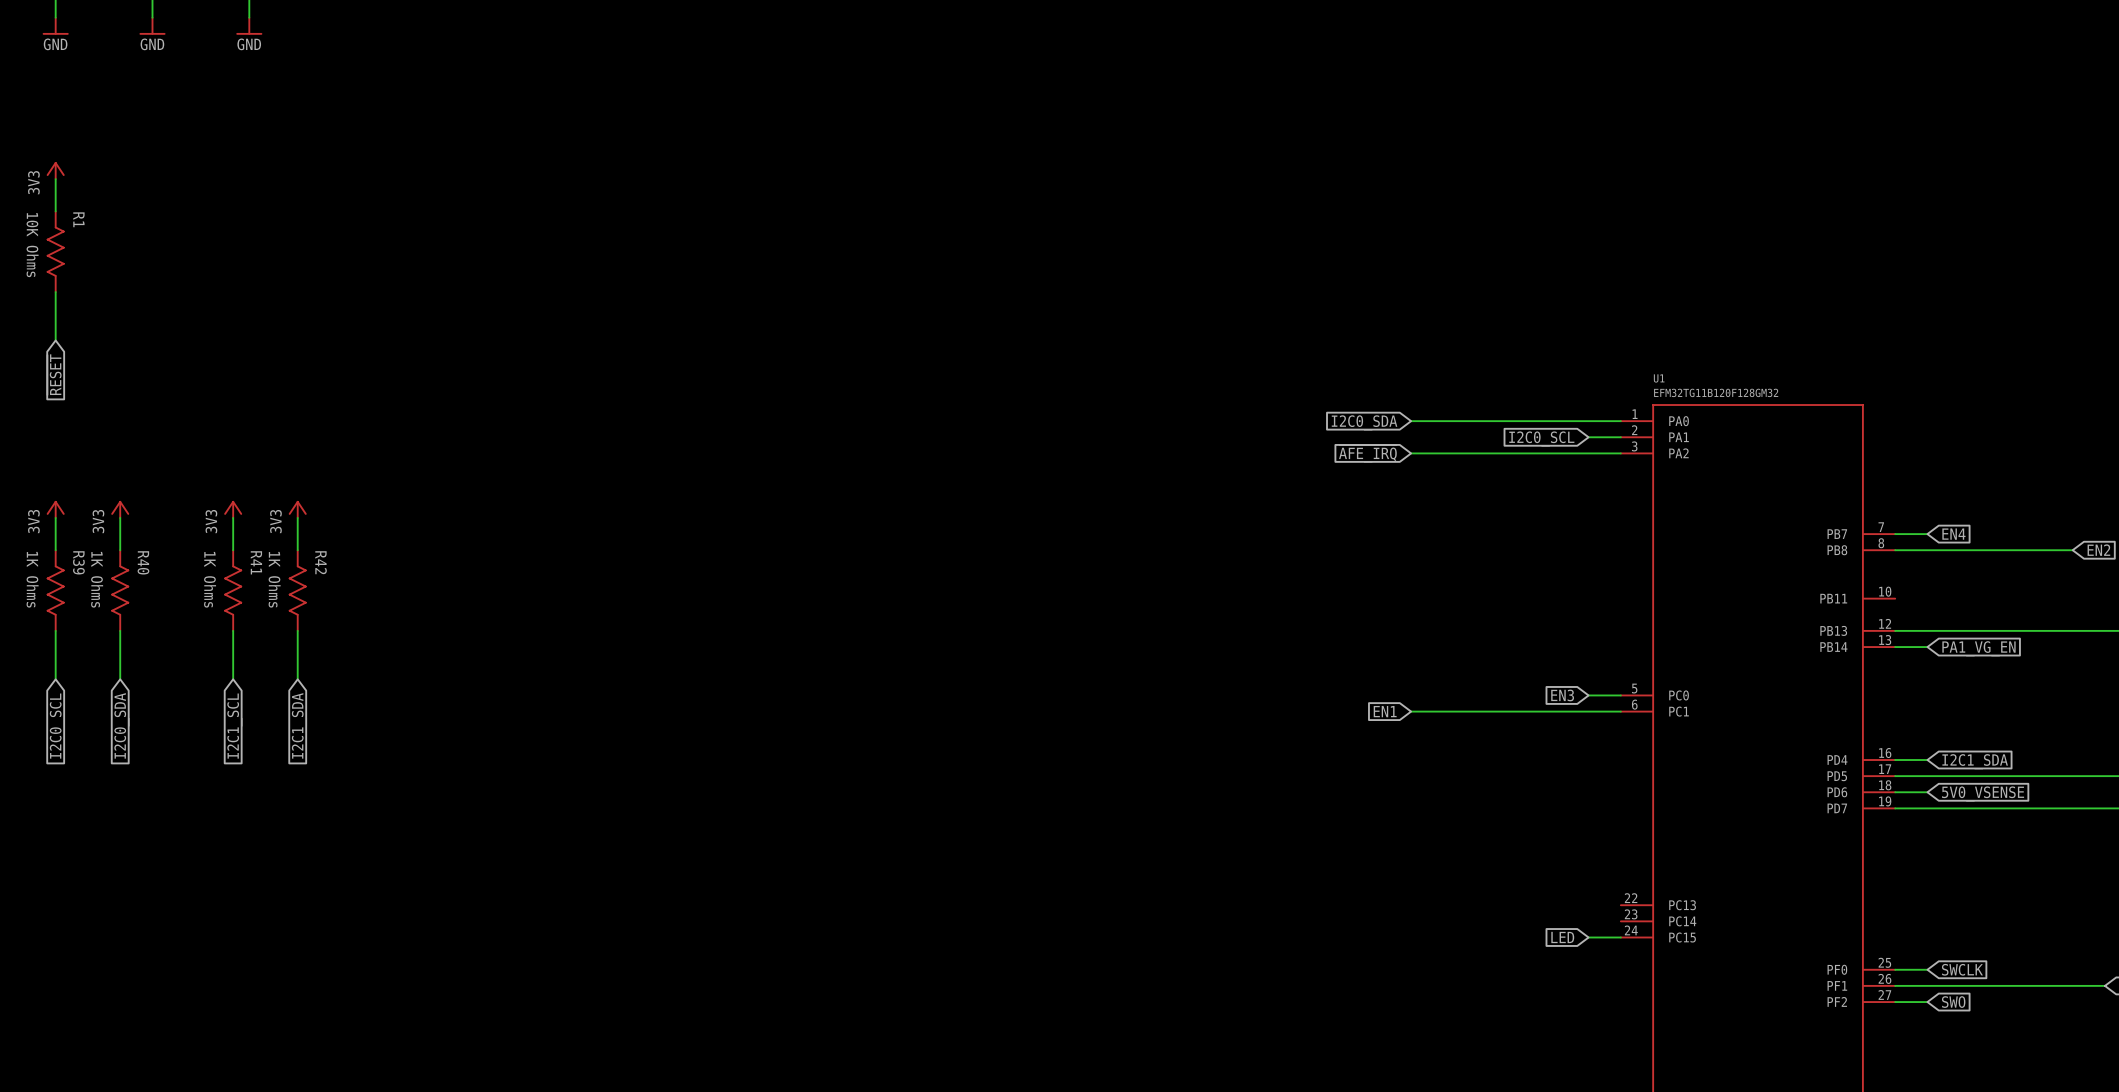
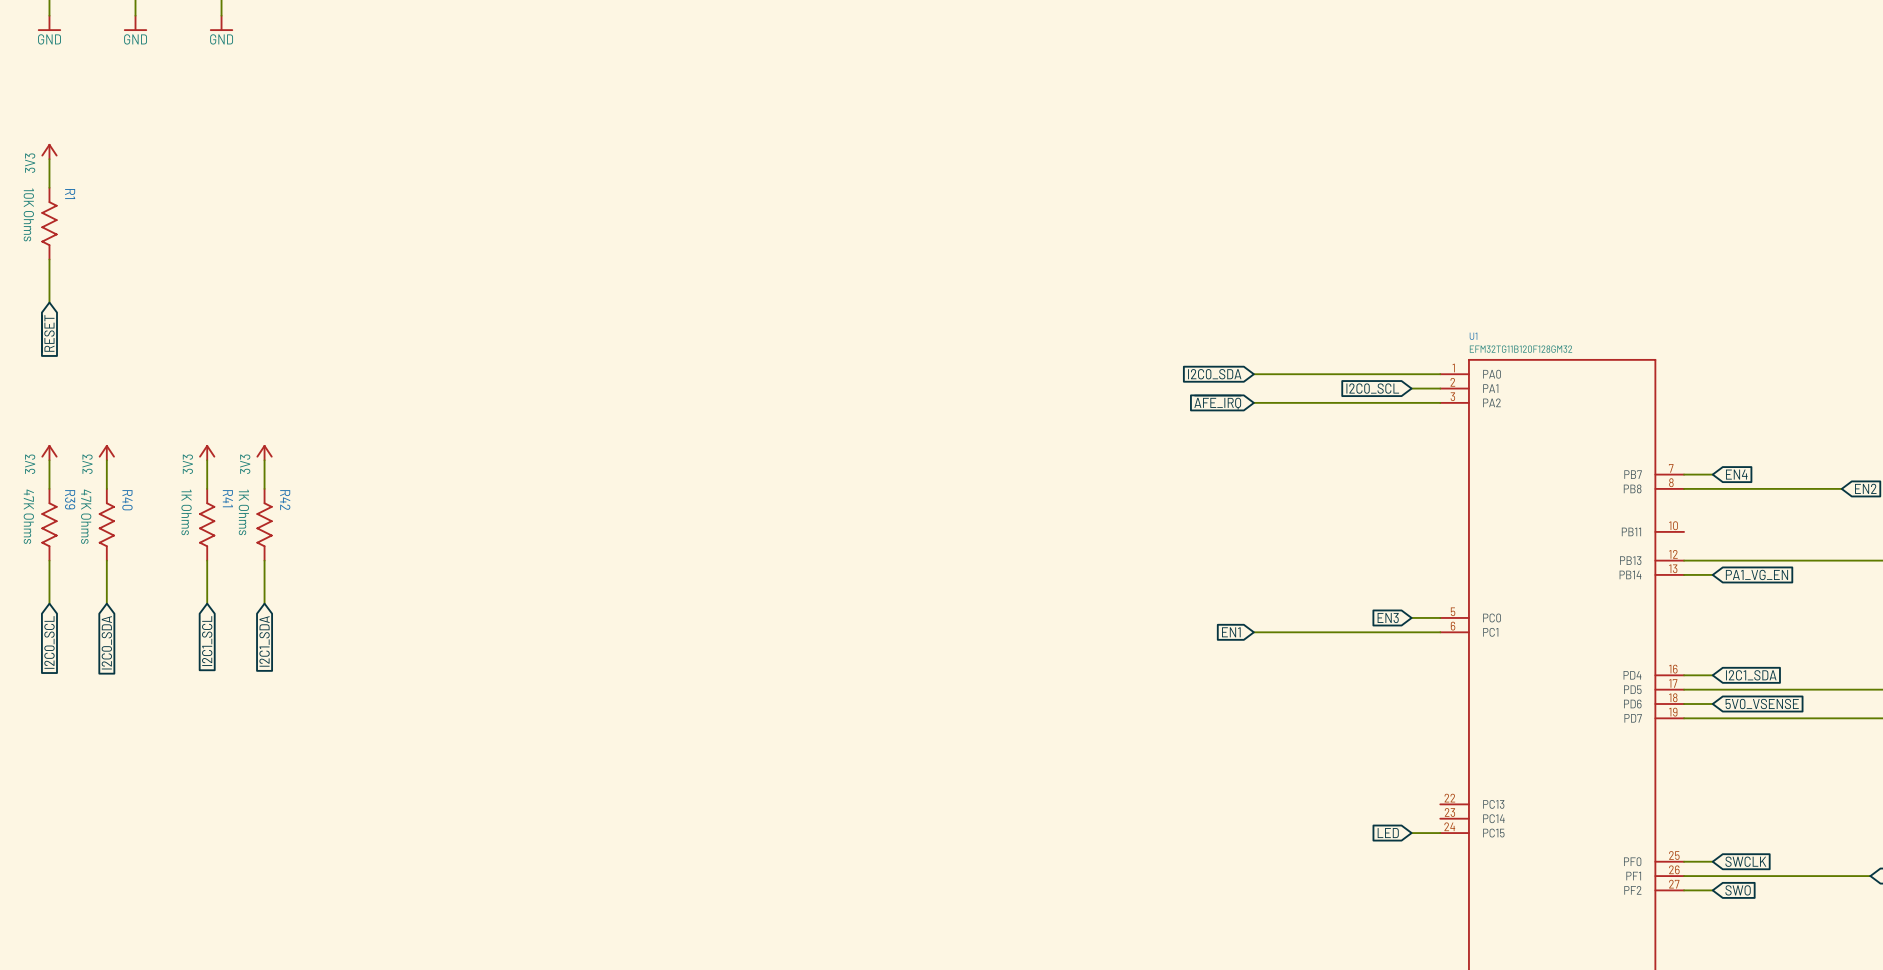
R39 value: 1K Ohms (32, 579) -> 47K Ohms (28, 516)
R40 value: 1K Ohms (97, 579) -> 47K Ohms (86, 516)

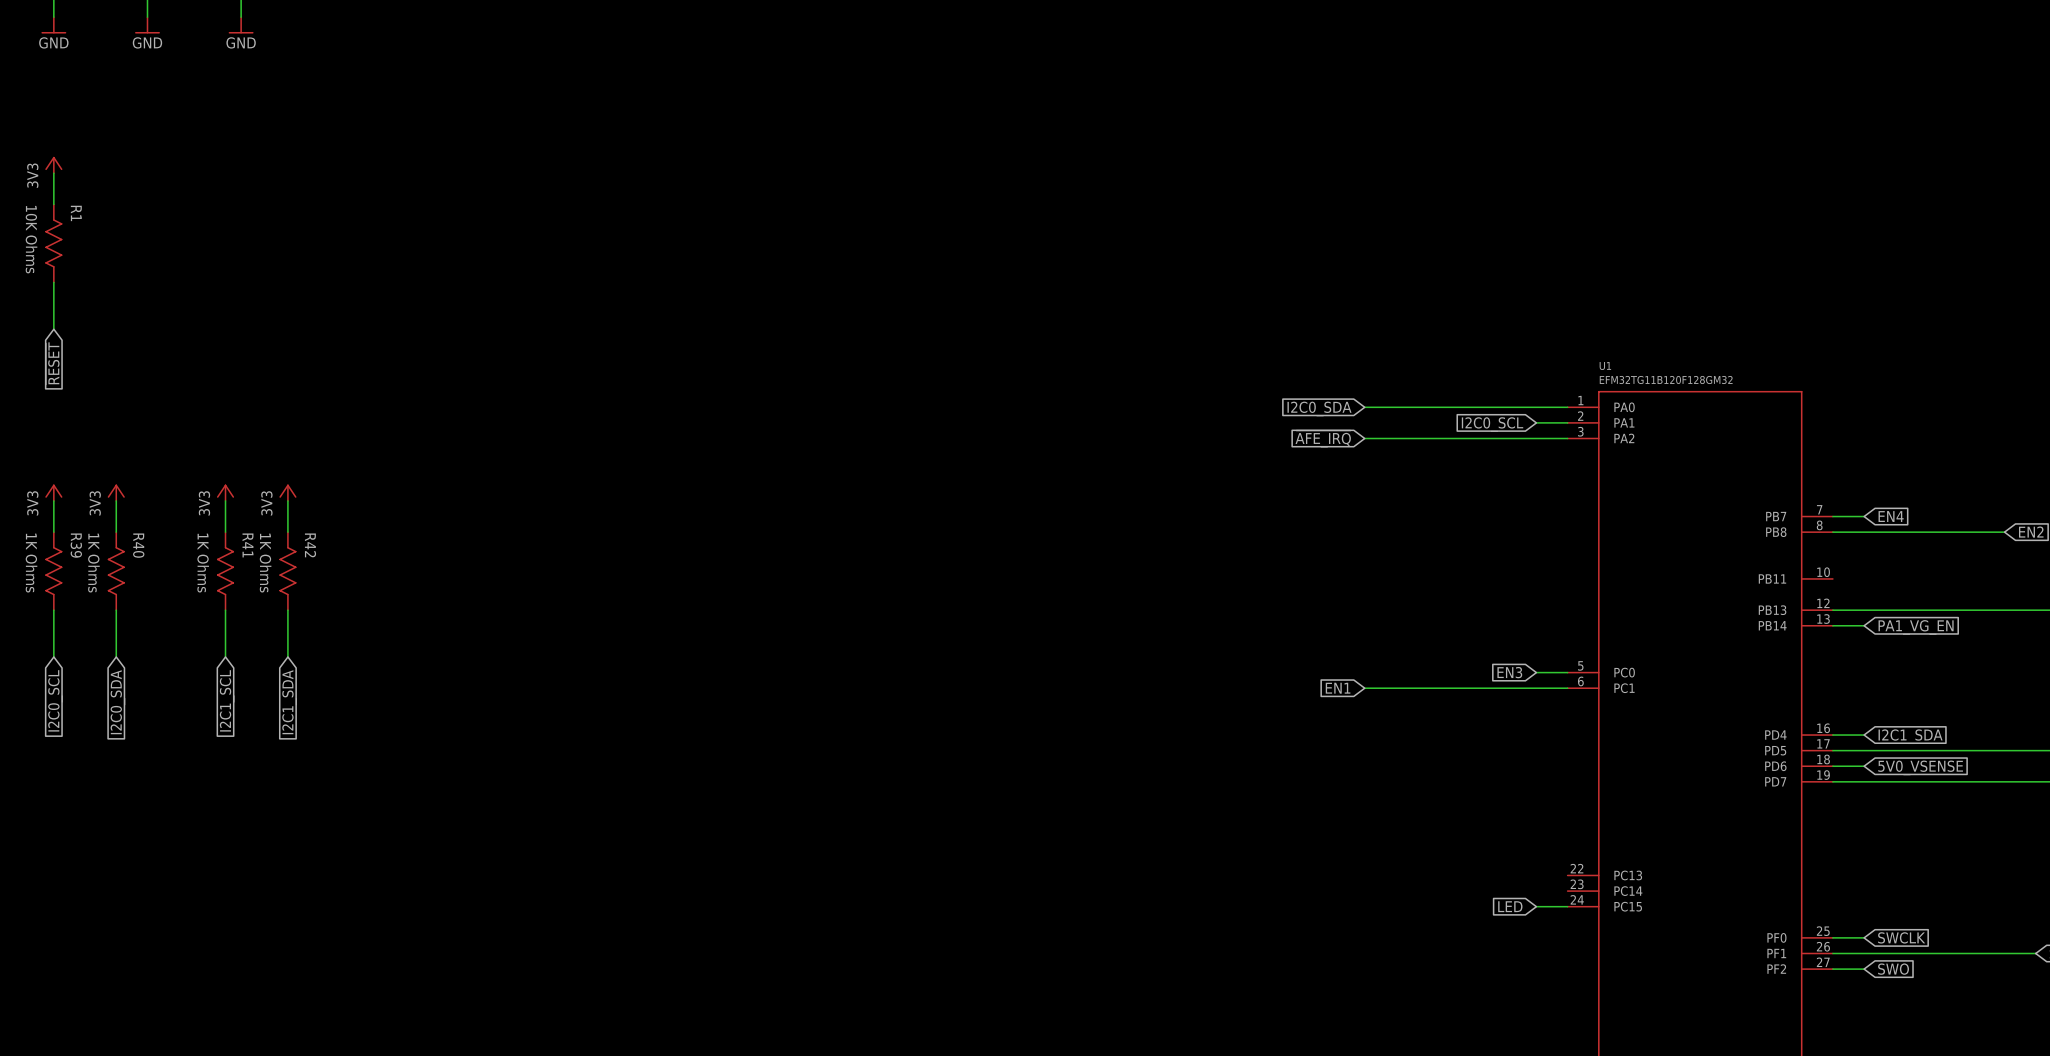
R39 value: 47K Ohms (28, 516) -> 1K Ohms (31, 563)
R40 value: 47K Ohms (86, 516) -> 1K Ohms (93, 563)

